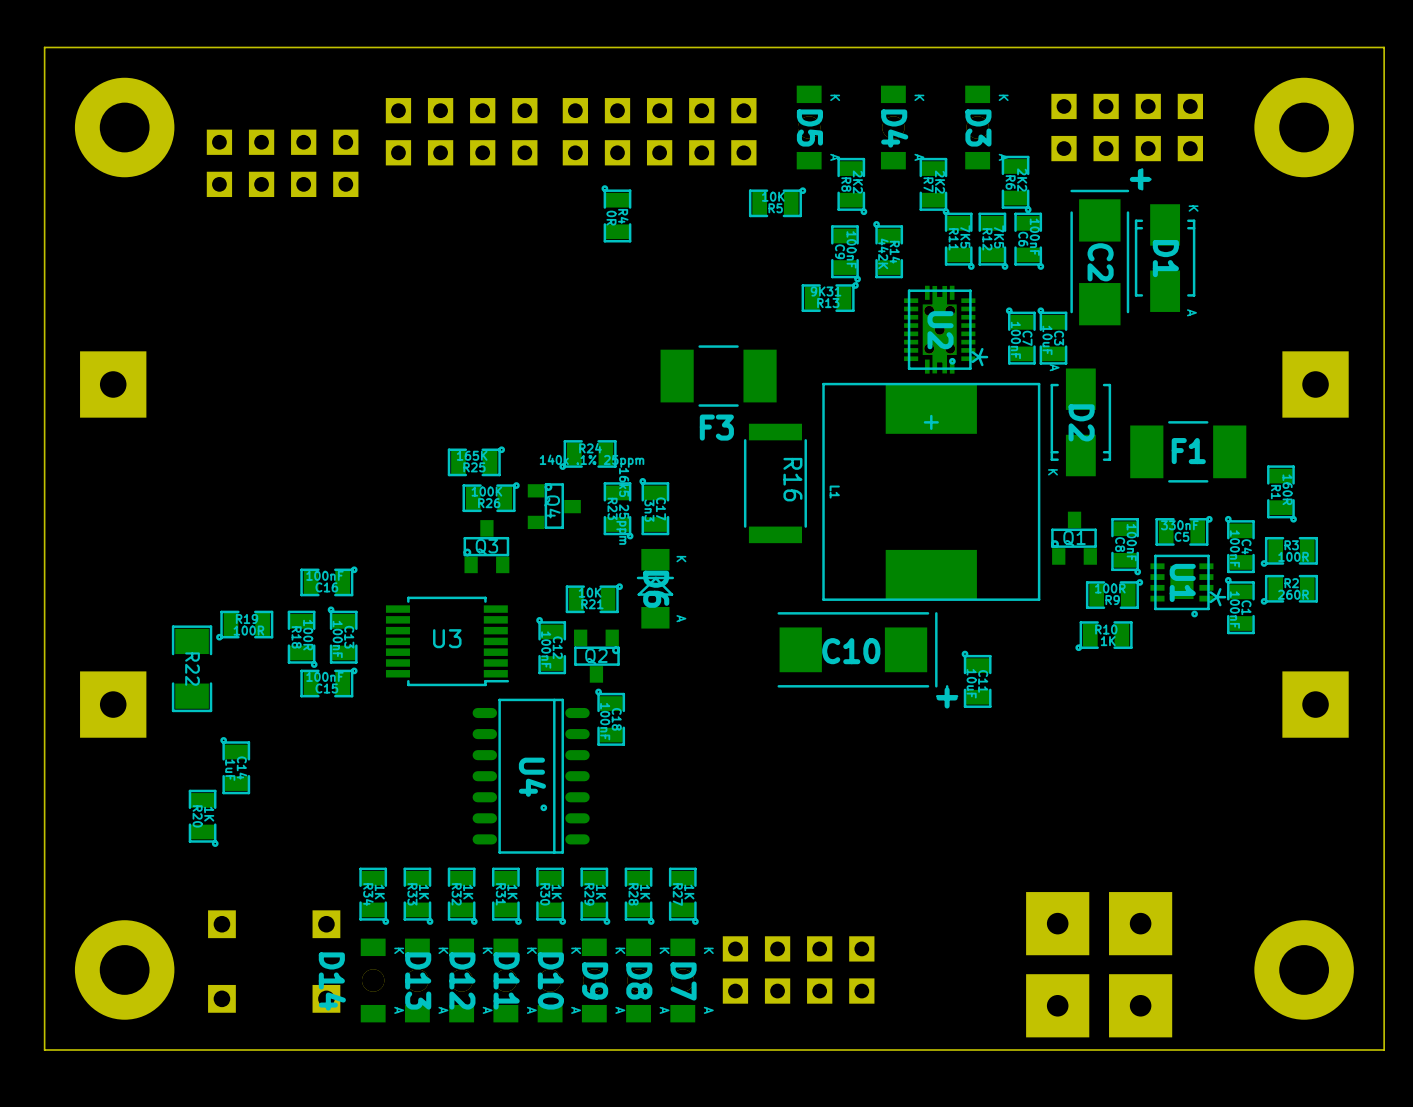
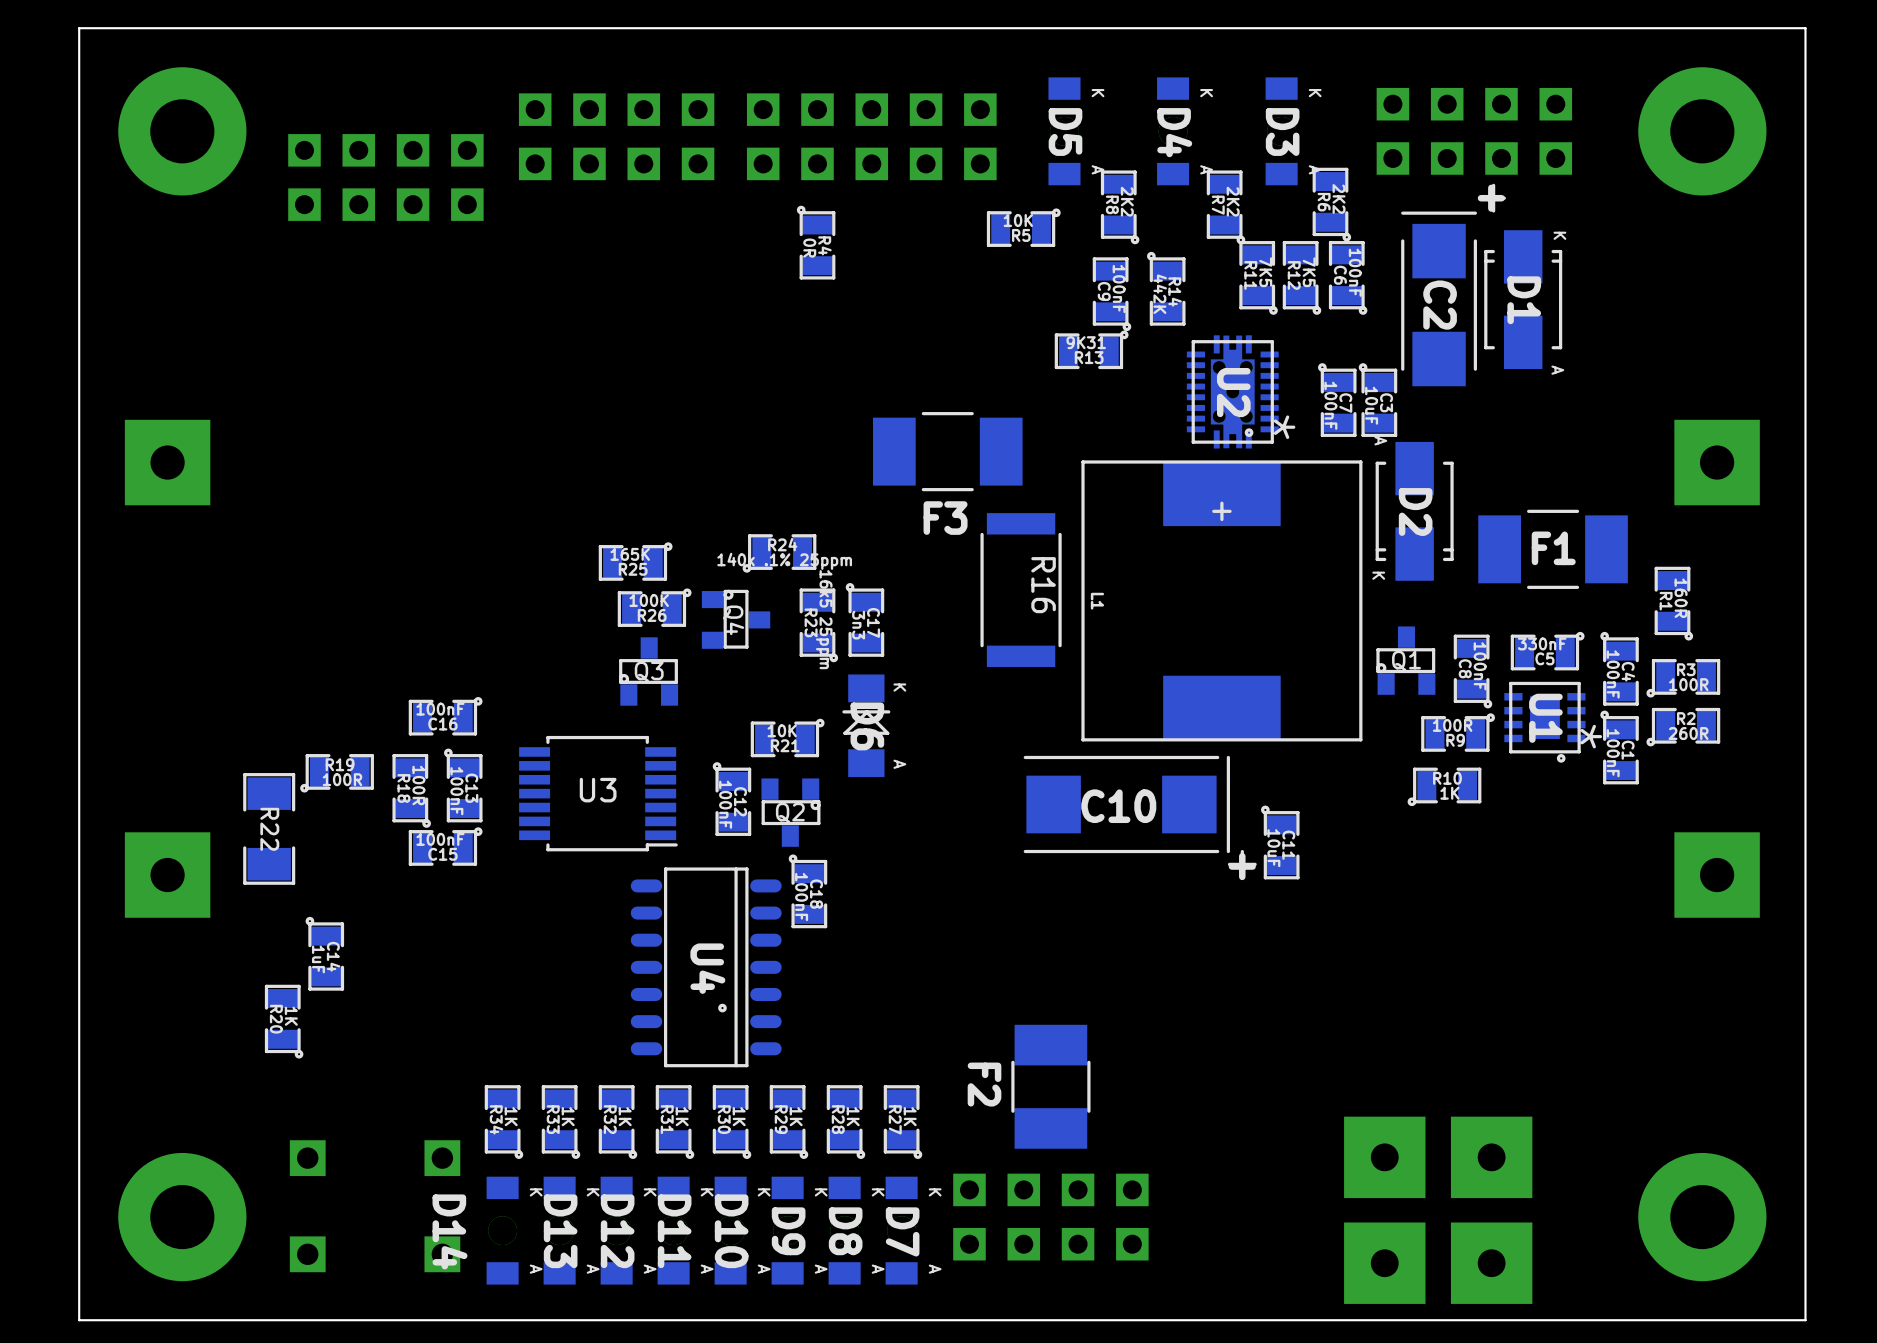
F2: none -> (1050, 1086)

